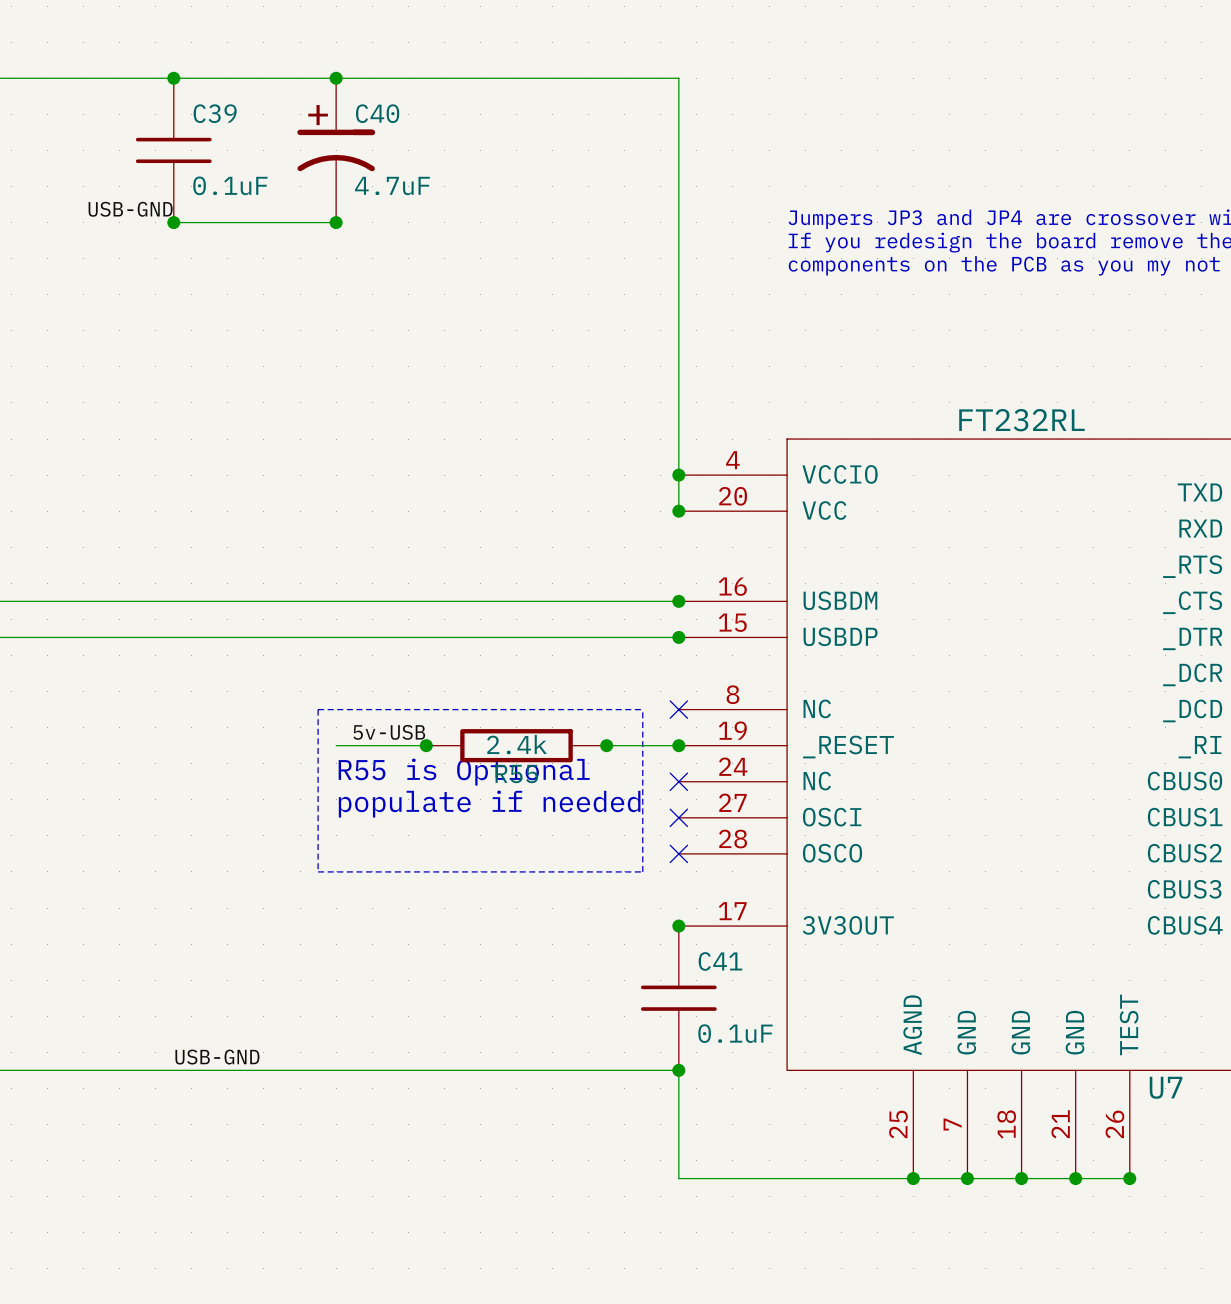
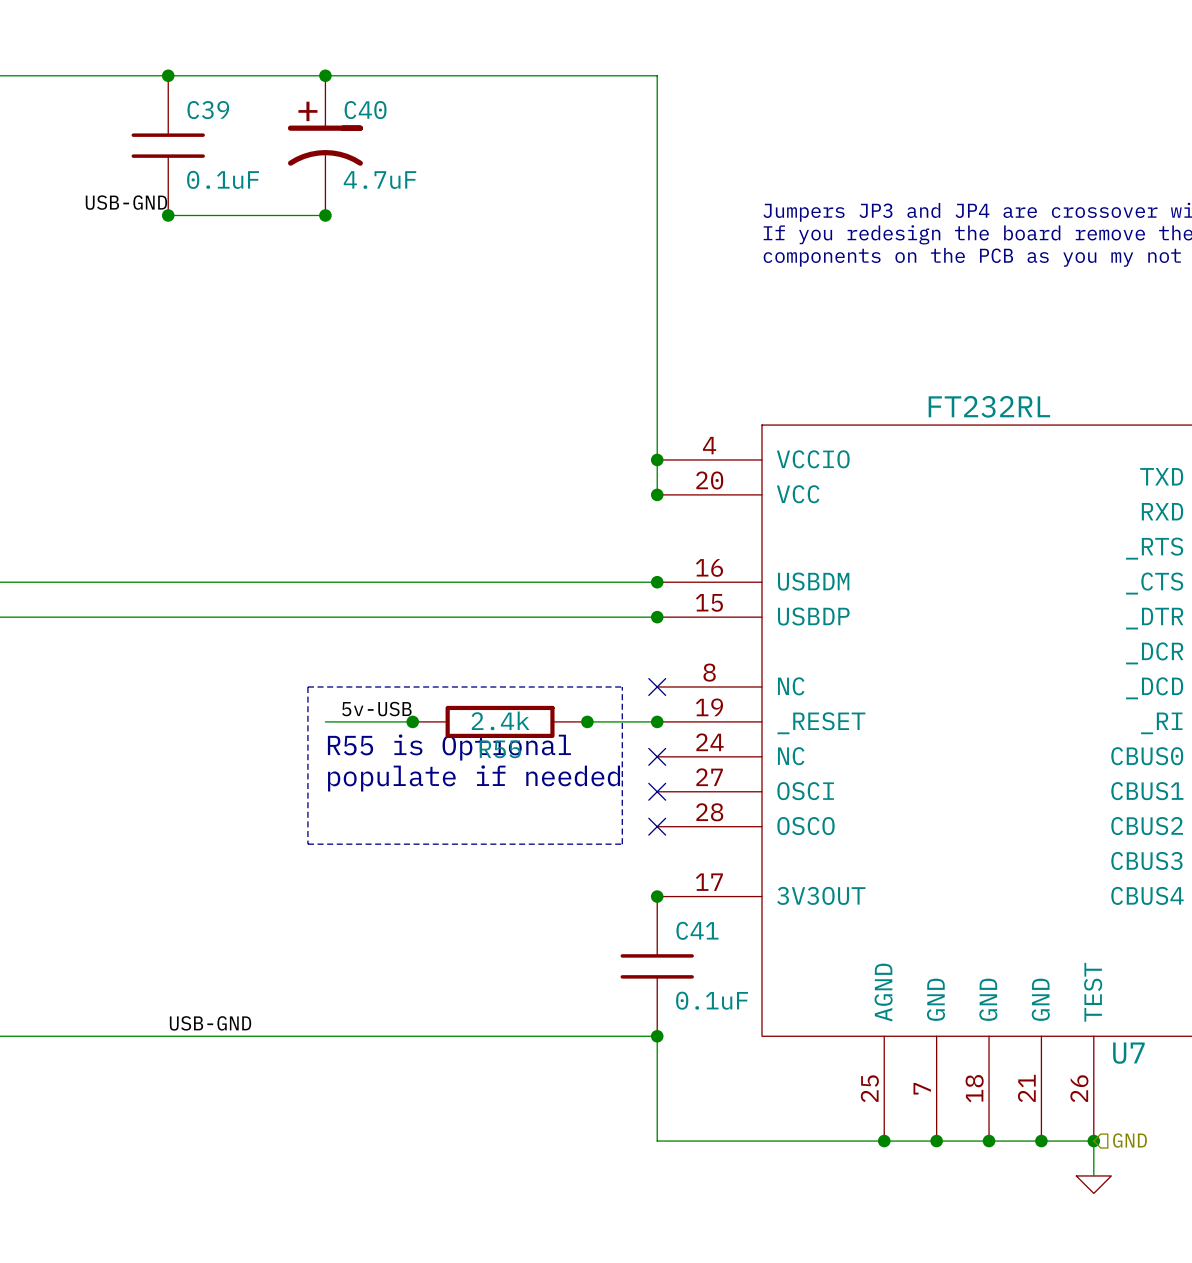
wire: none -> (1093, 1141) (1093, 1175)
hierarchical label: none -> GND (1129, 1140)
power symbol: none -> (1093, 1184)

